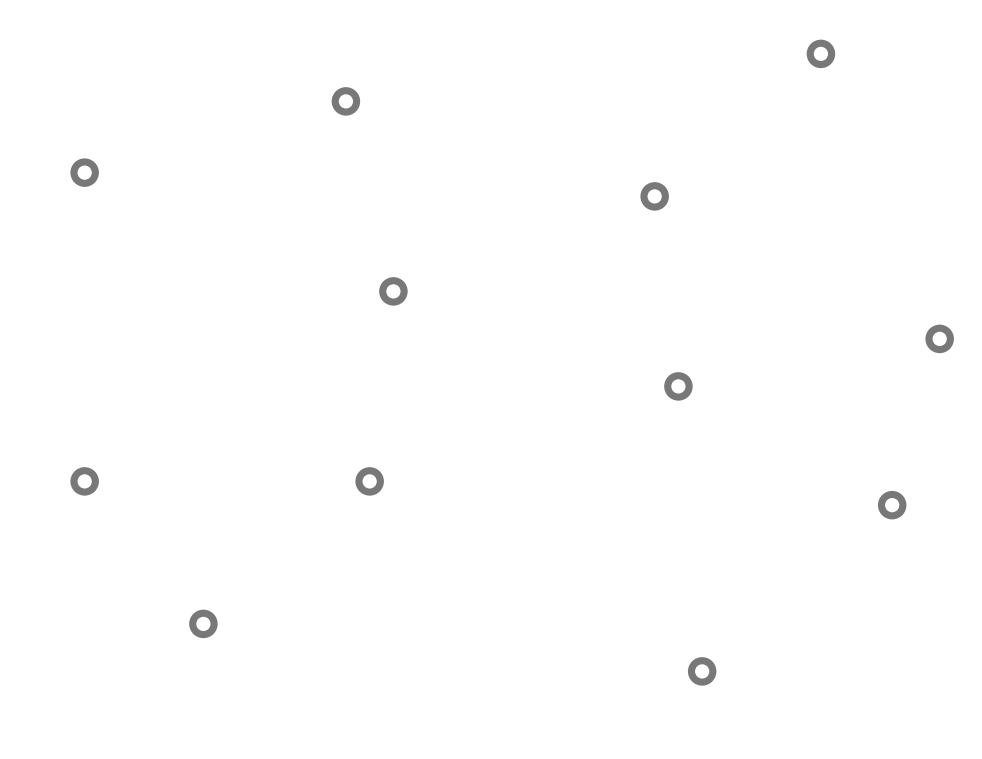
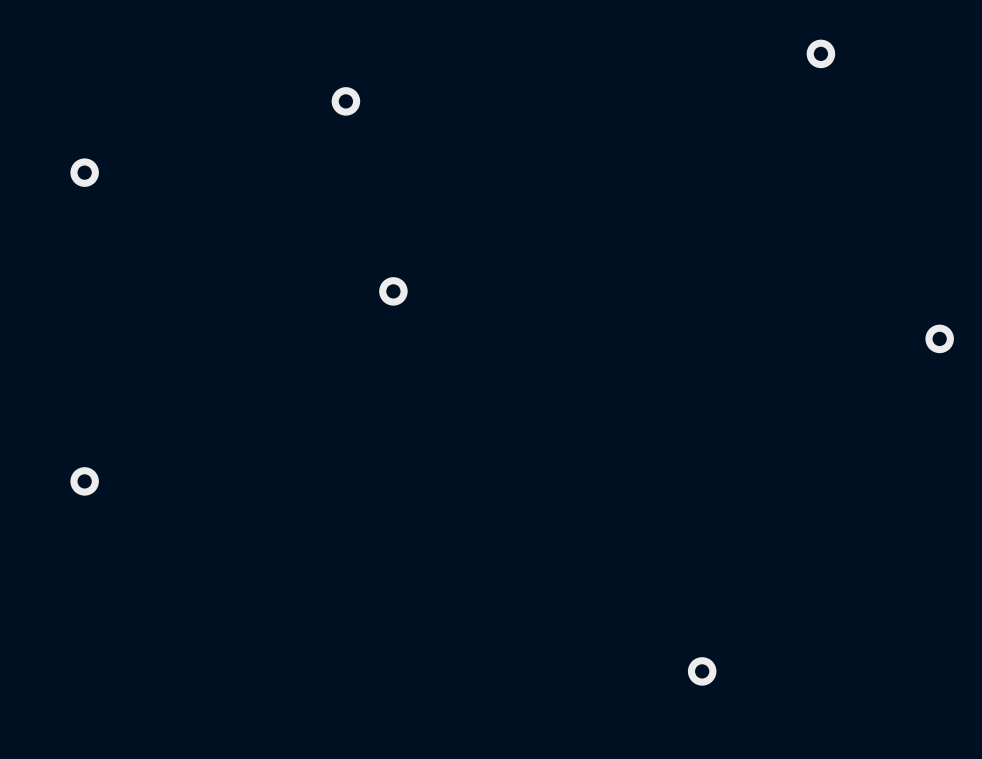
via: (654, 196) -> none
via: (678, 386) -> none
via: (369, 481) -> none
via: (892, 505) -> none
via: (203, 623) -> none

